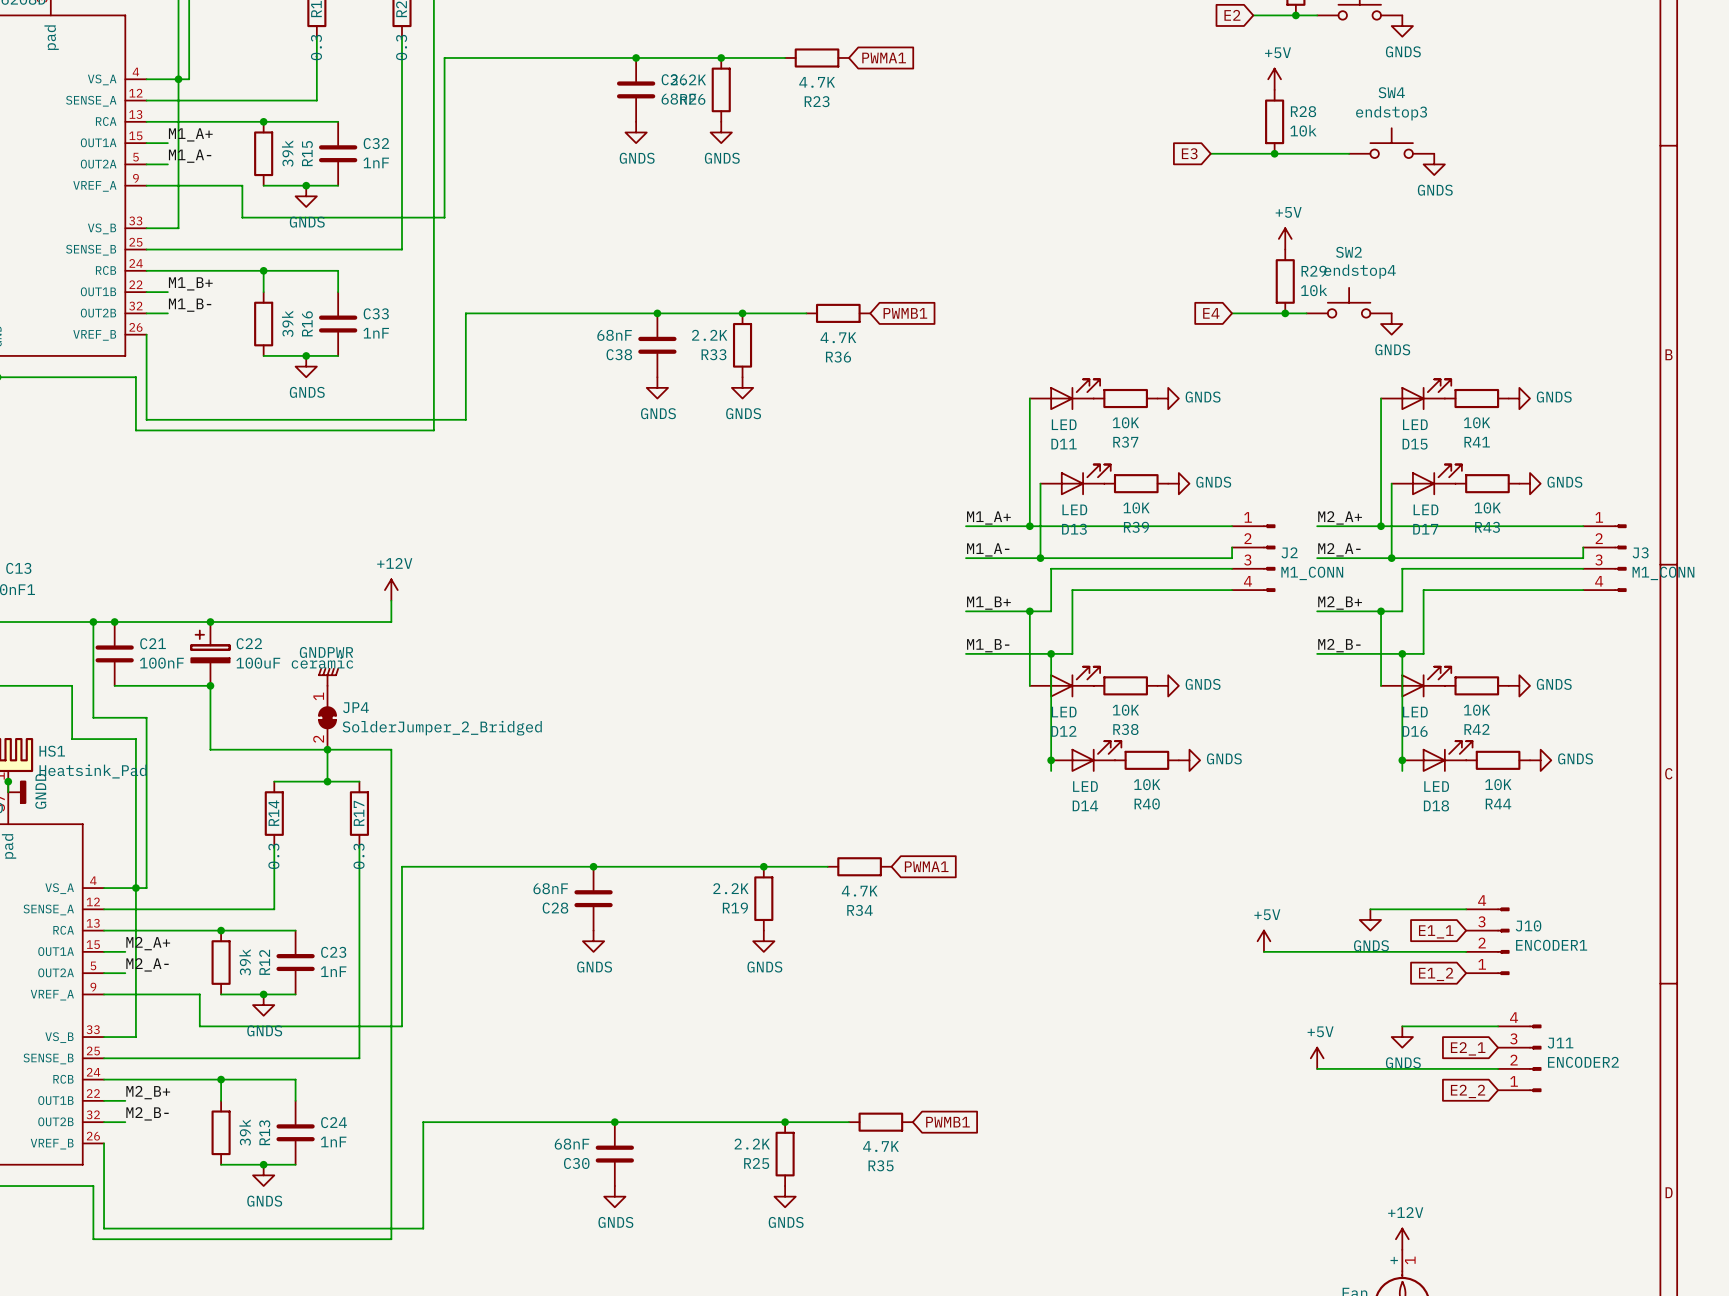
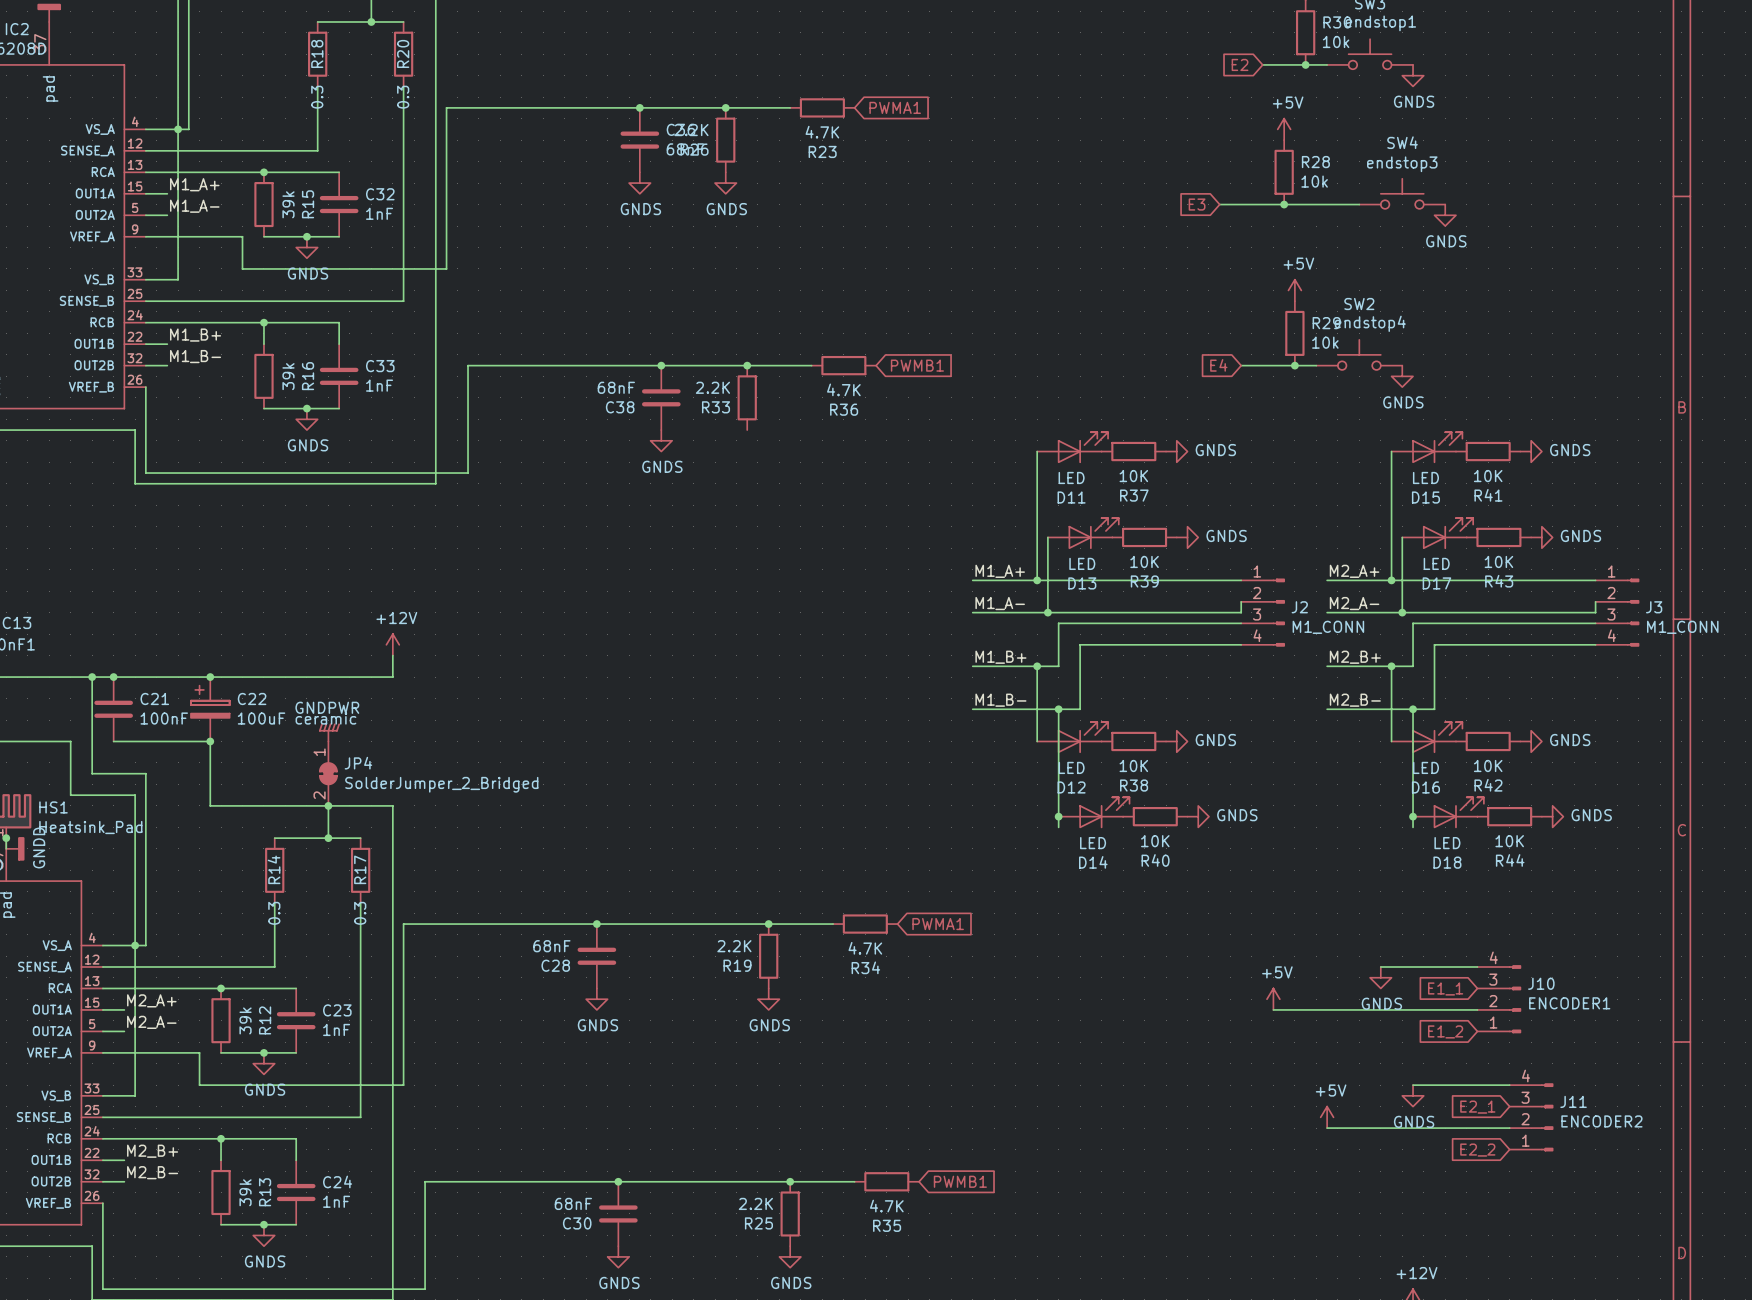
power symbol: GNDS (742, 387) -> none

